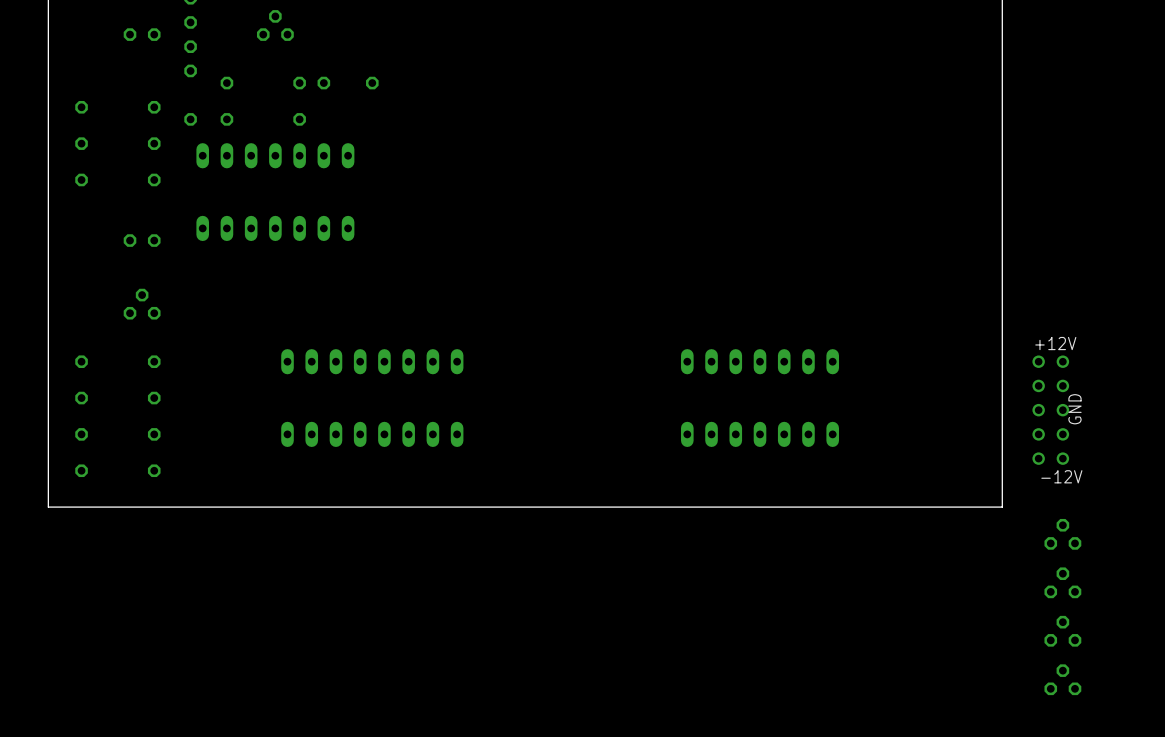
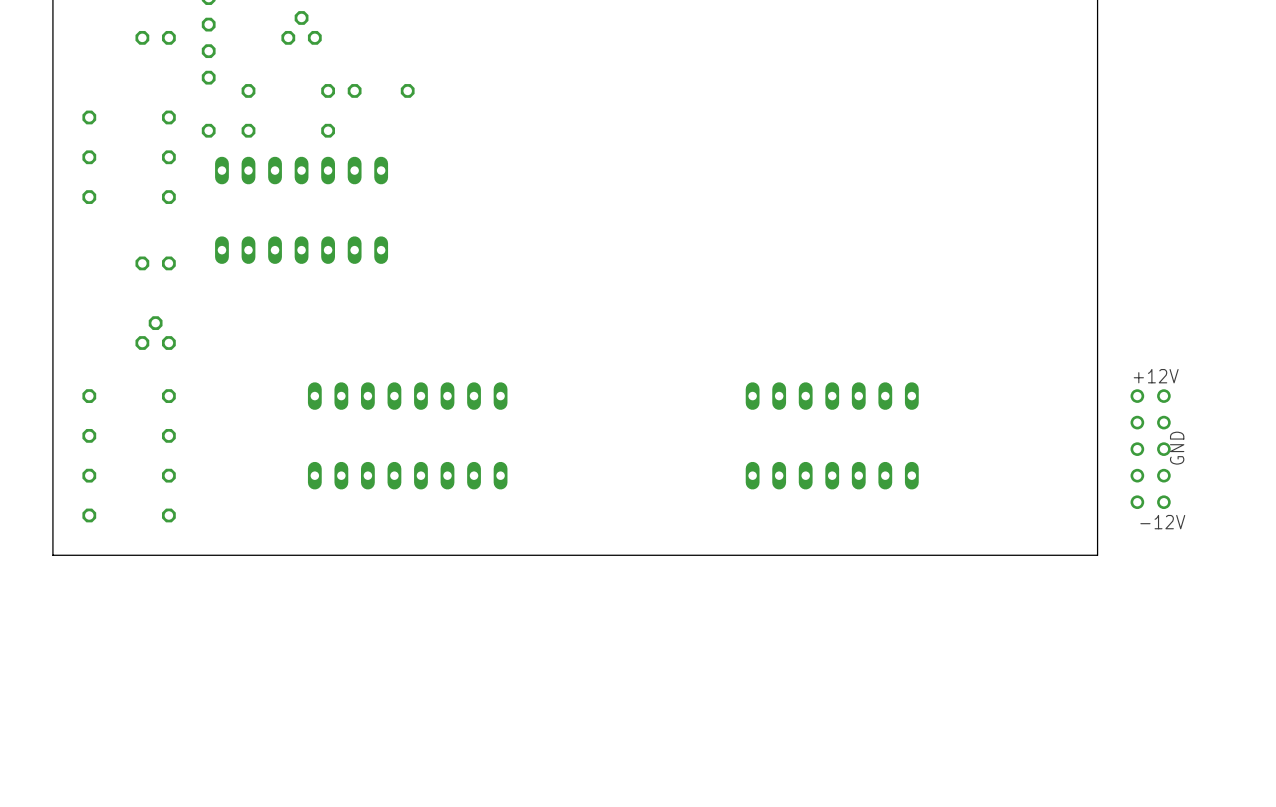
part: (1062, 534) -> none
part: (1062, 582) -> none
part: (1062, 631) -> none
part: (1062, 679) -> none

